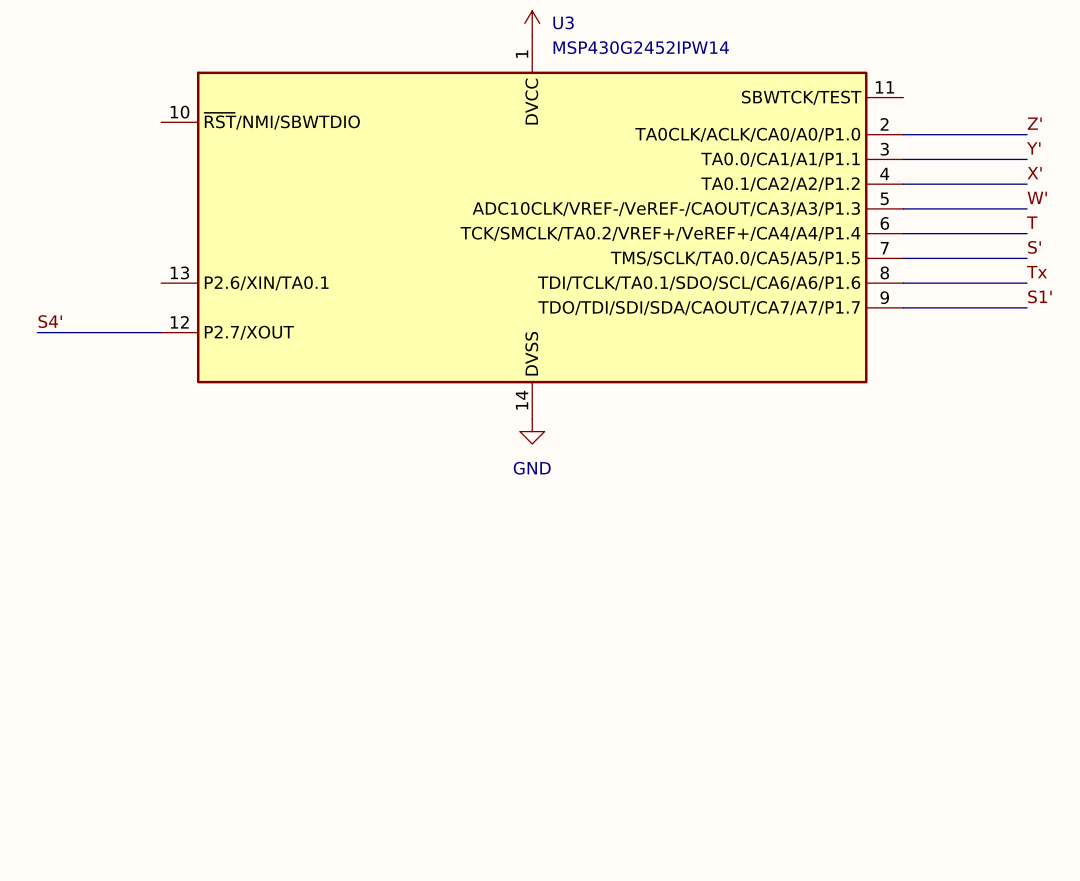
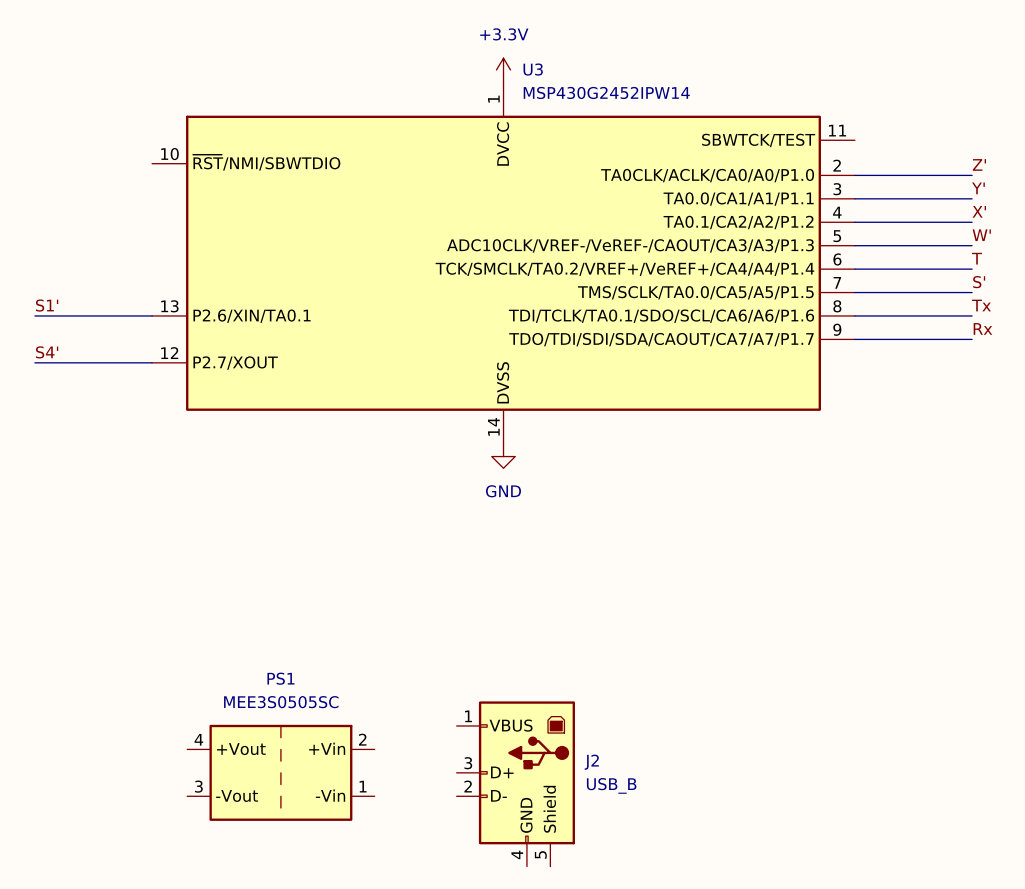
label: none -> S1' (47, 305)
wire: none -> (34, 315) (152, 315)
label: S1' (1039, 296) -> Rx (982, 328)
PS1: none -> MEE3S0505SC (280, 772)
J2: none -> USB_B (515, 783)

